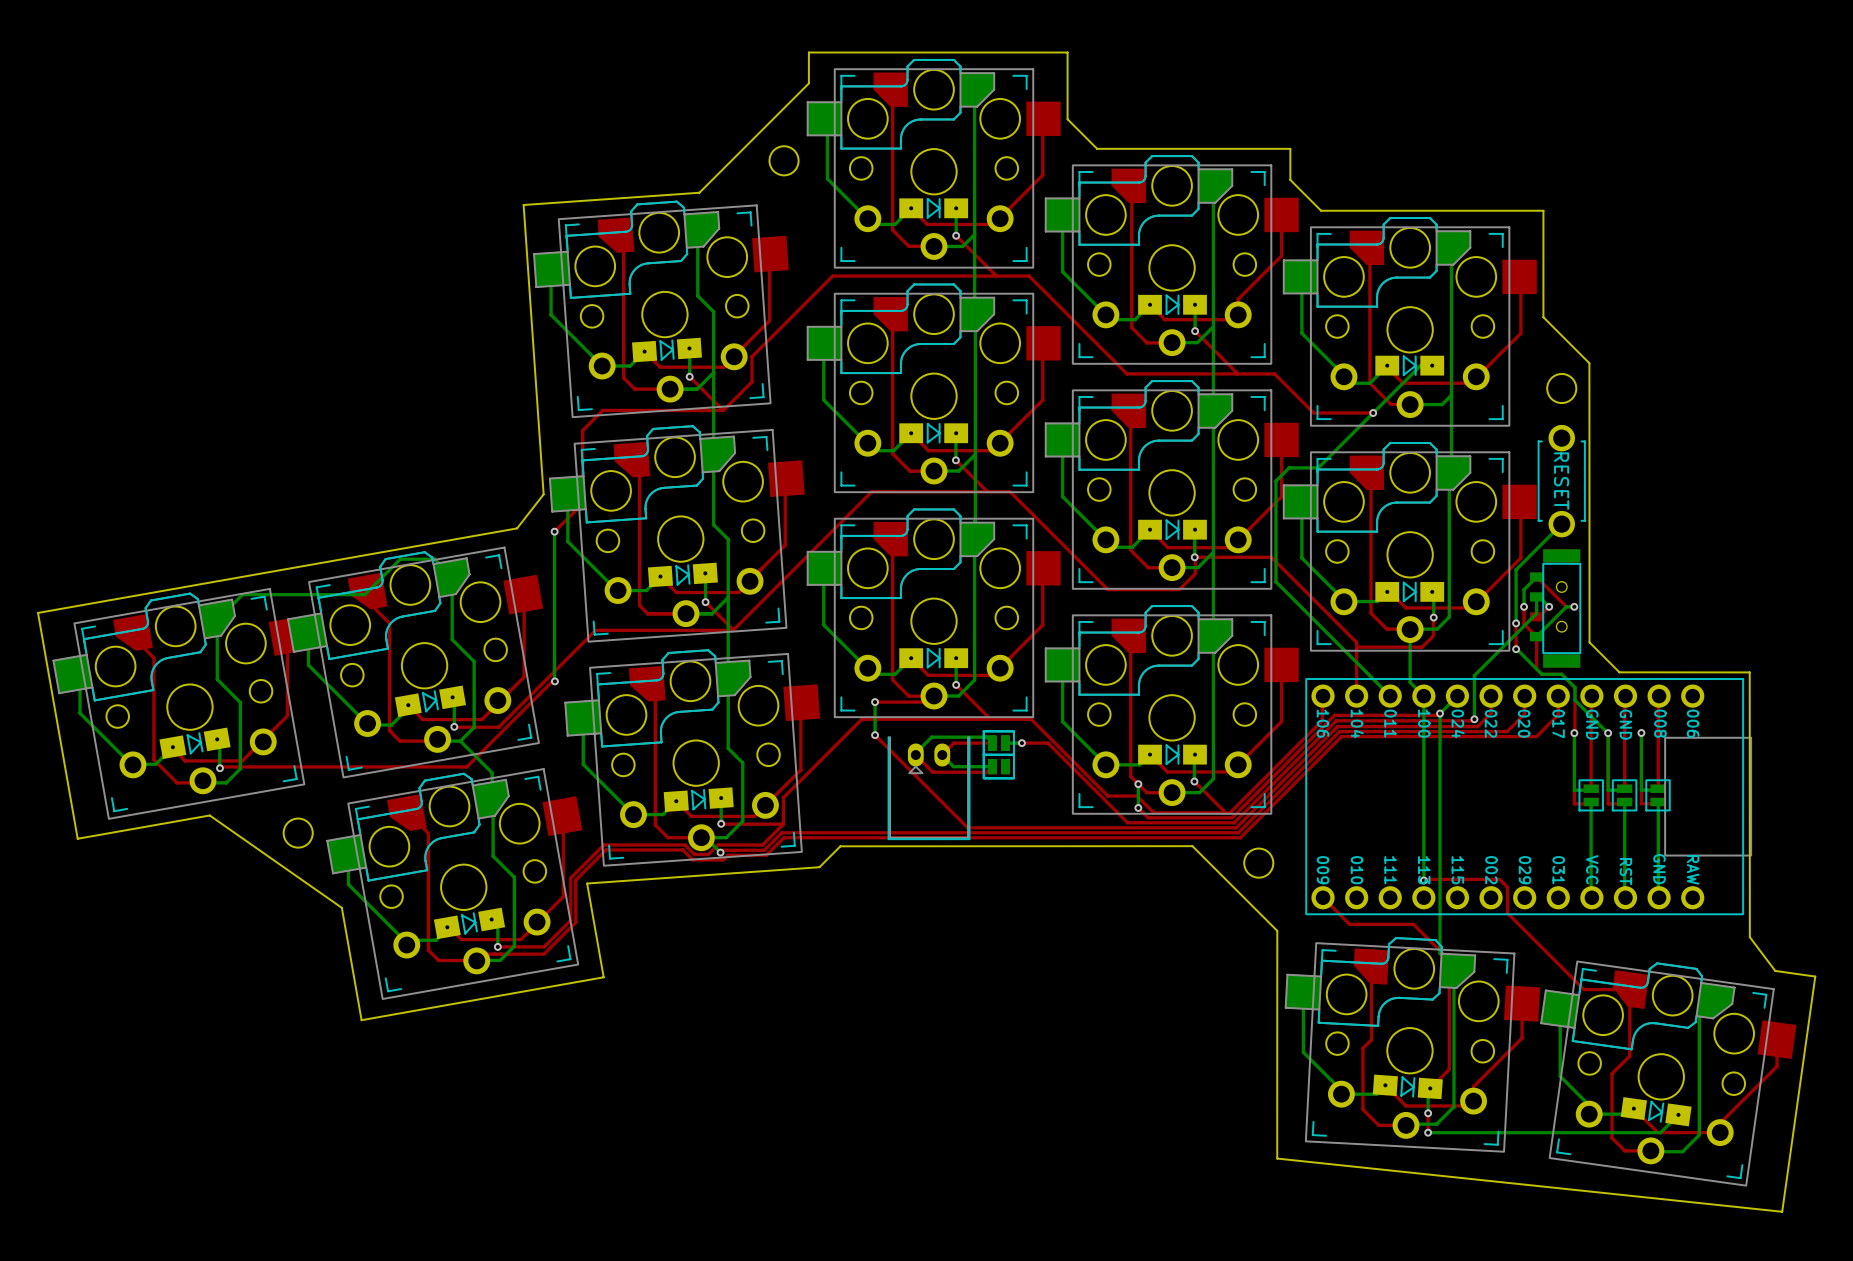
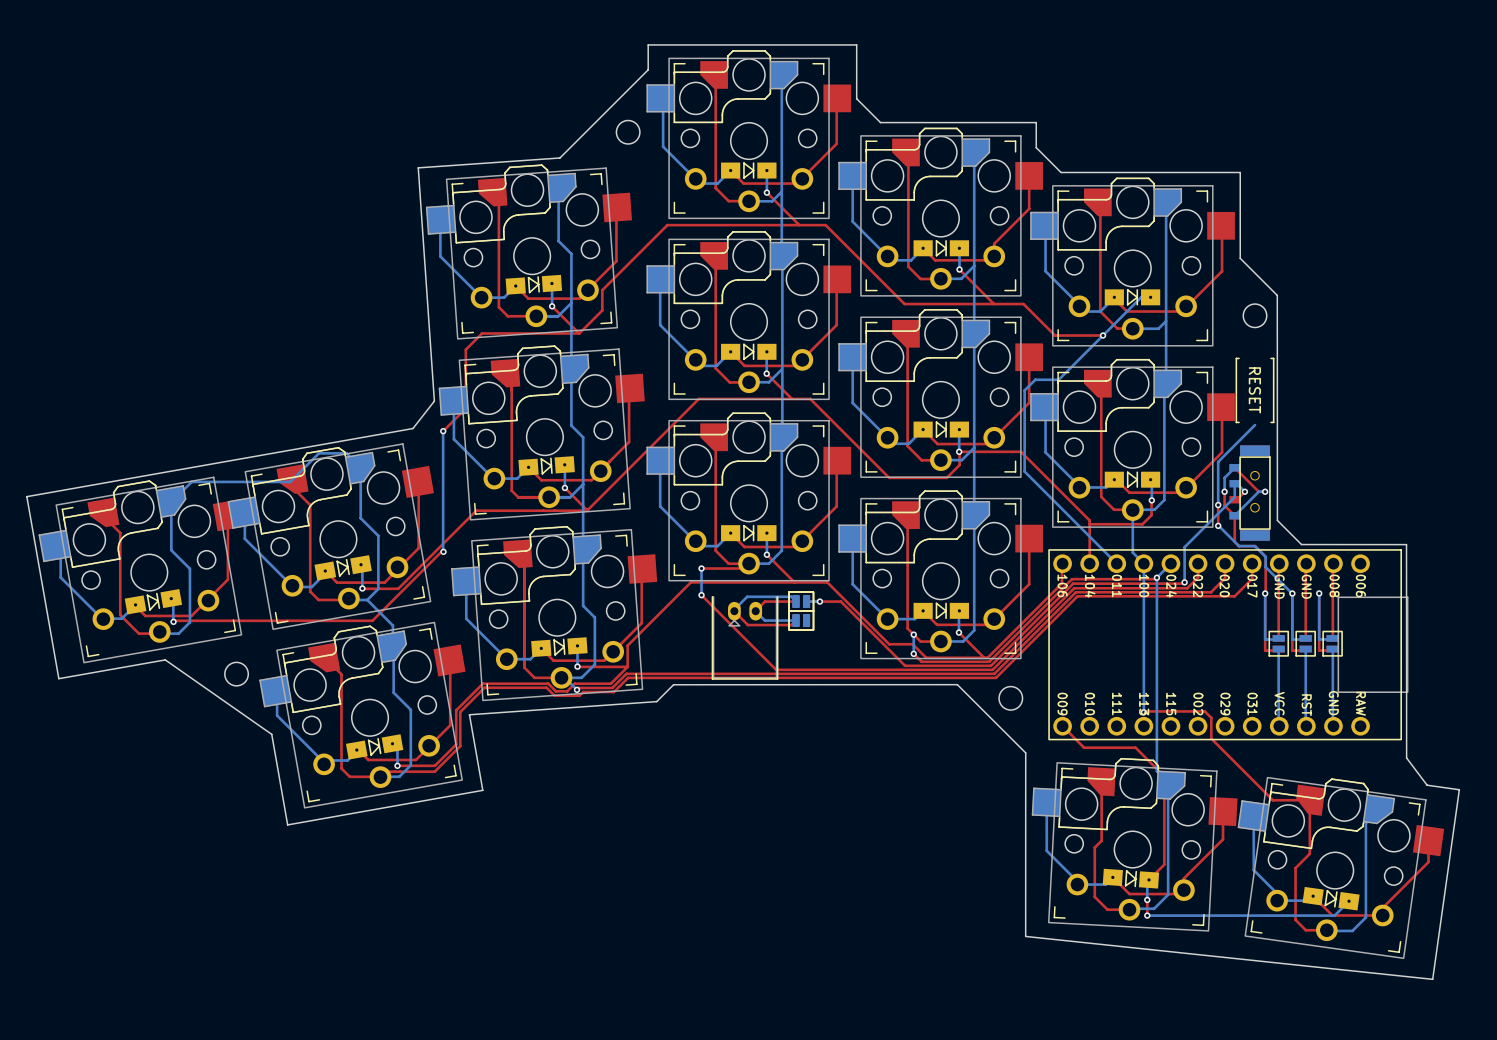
drawing: none -> [1235, 357, 1275, 424]
part: (1561, 481) -> none

